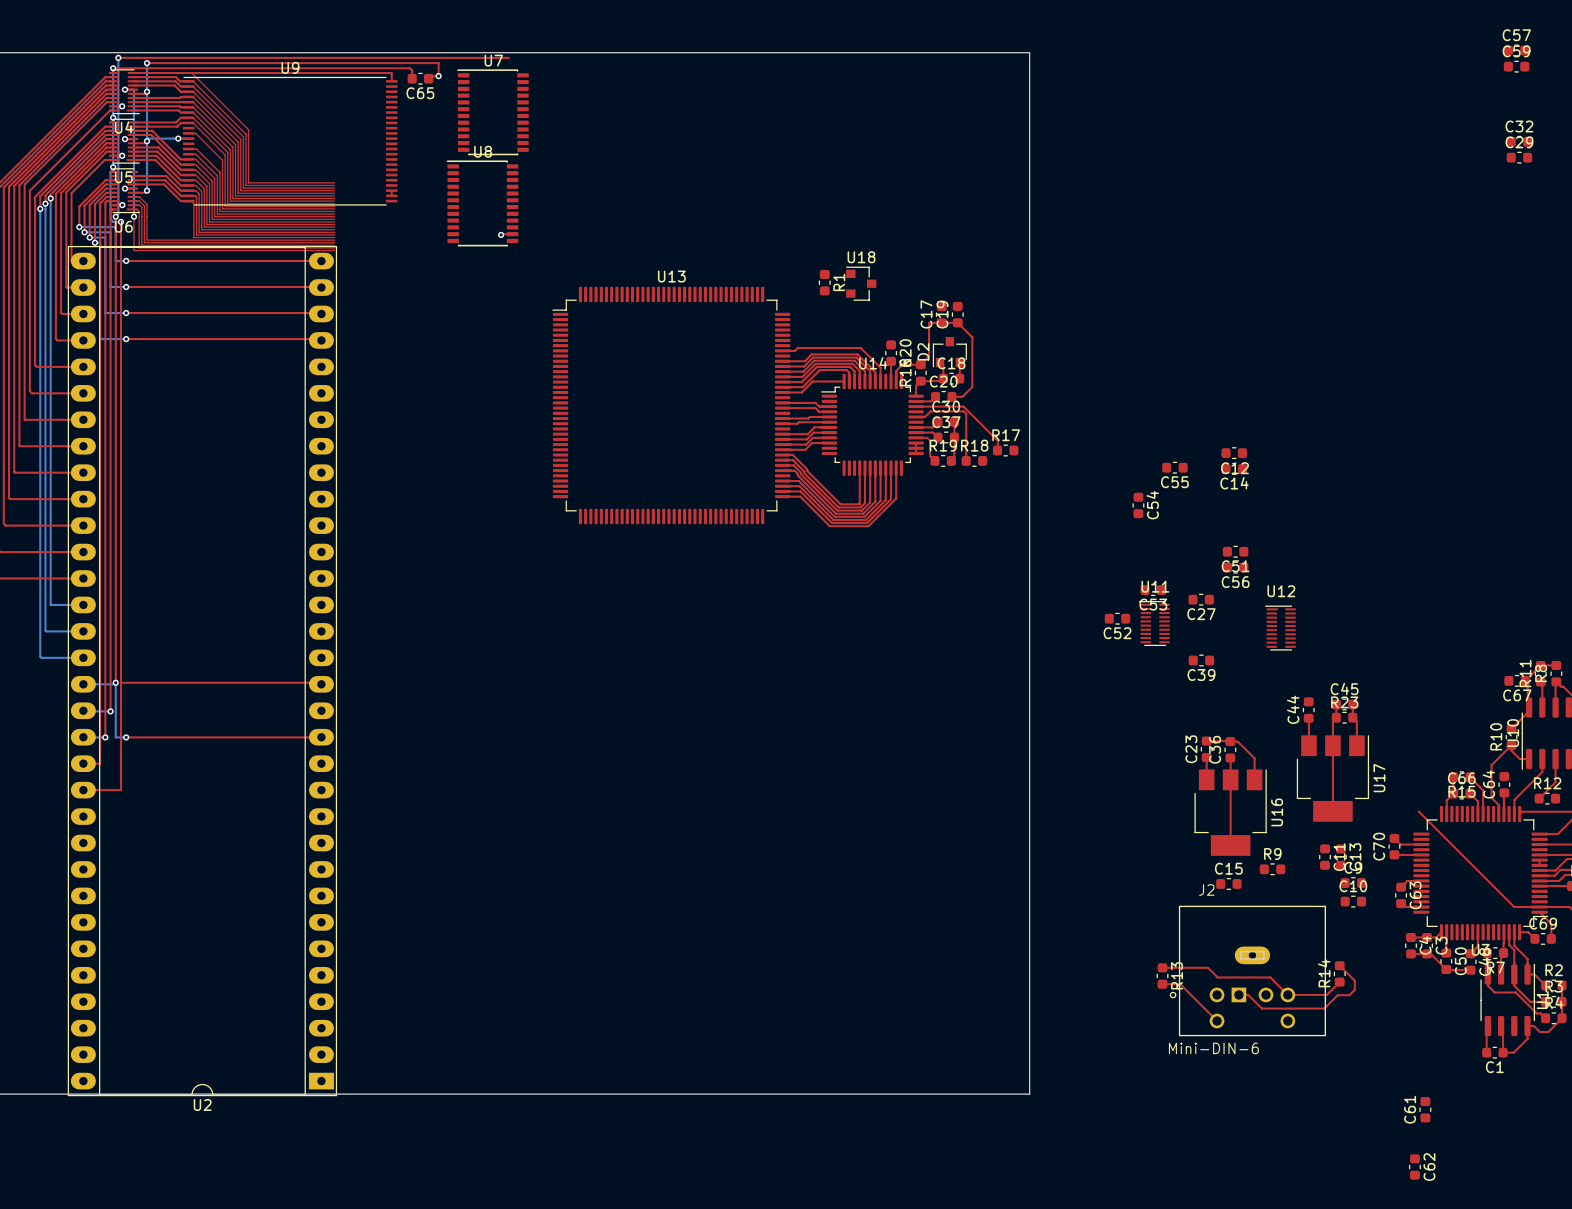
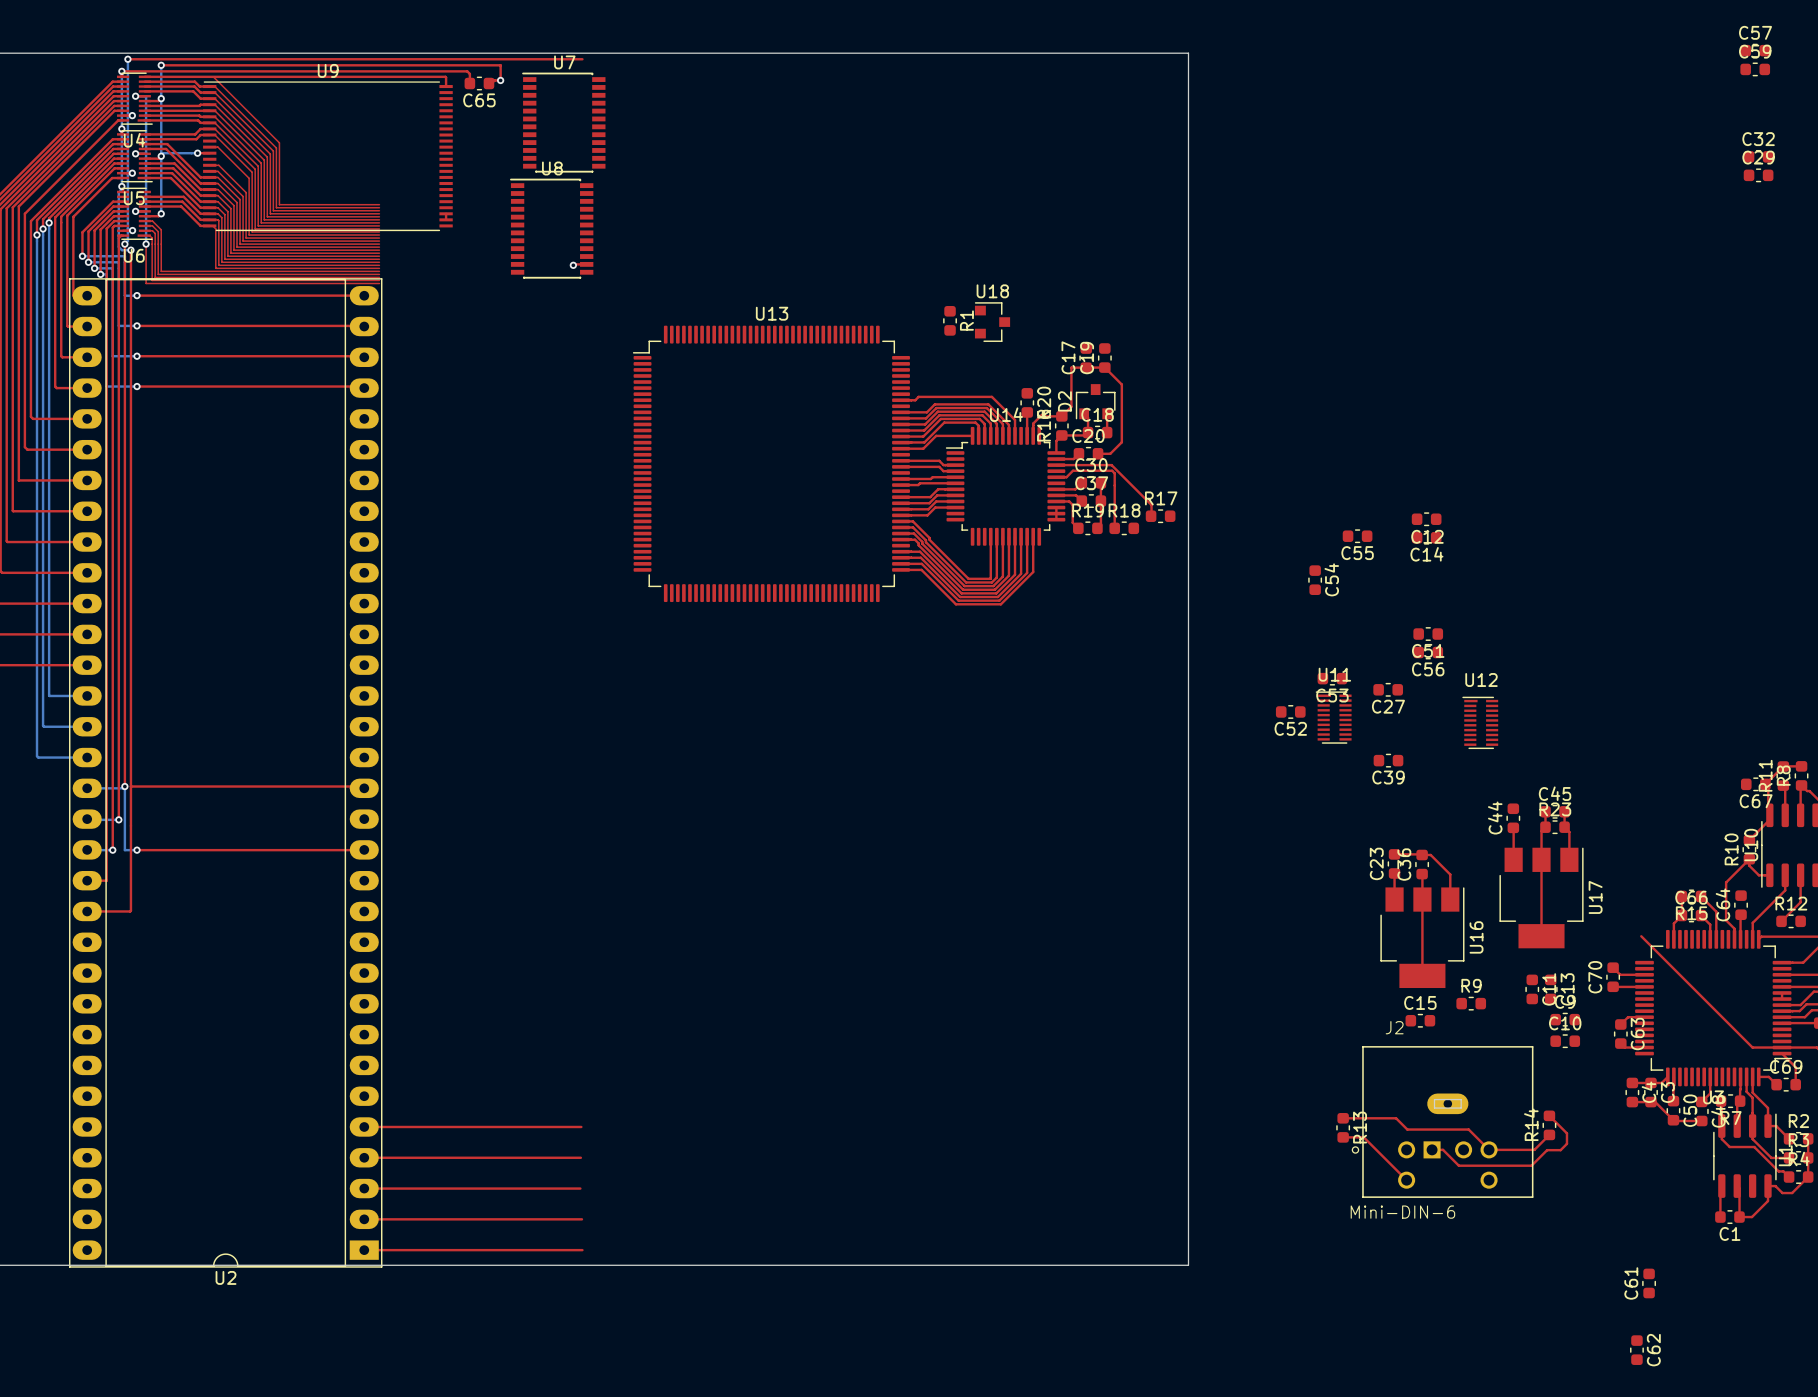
top track: none -> (364, 1126) (581, 1126)
top track: none -> (364, 1157) (580, 1157)
top track: none -> (364, 1188) (580, 1188)
top track: none -> (364, 1219) (581, 1219)
top track: none -> (364, 1250) (582, 1250)

